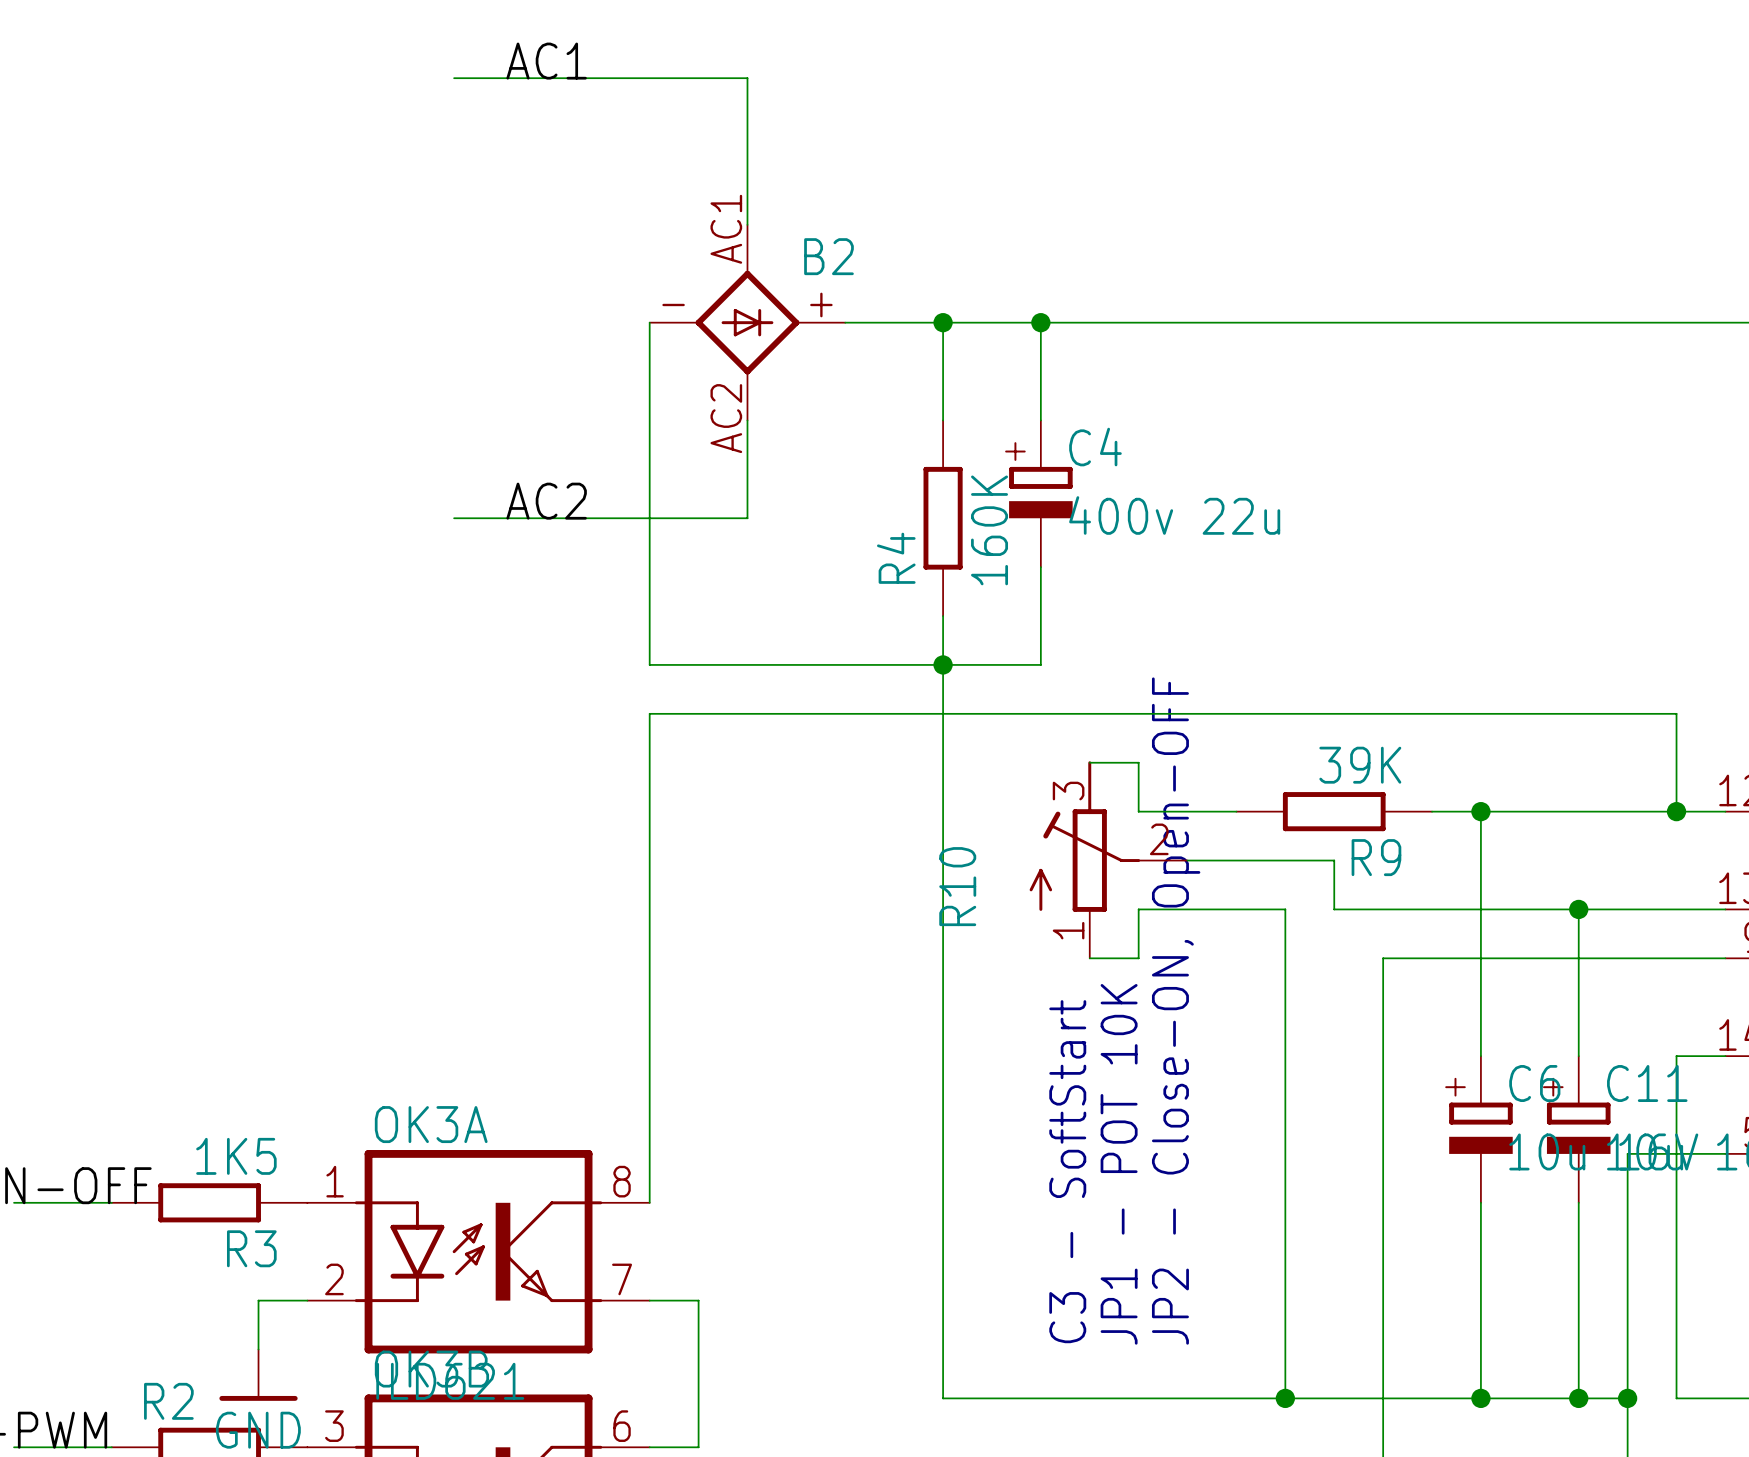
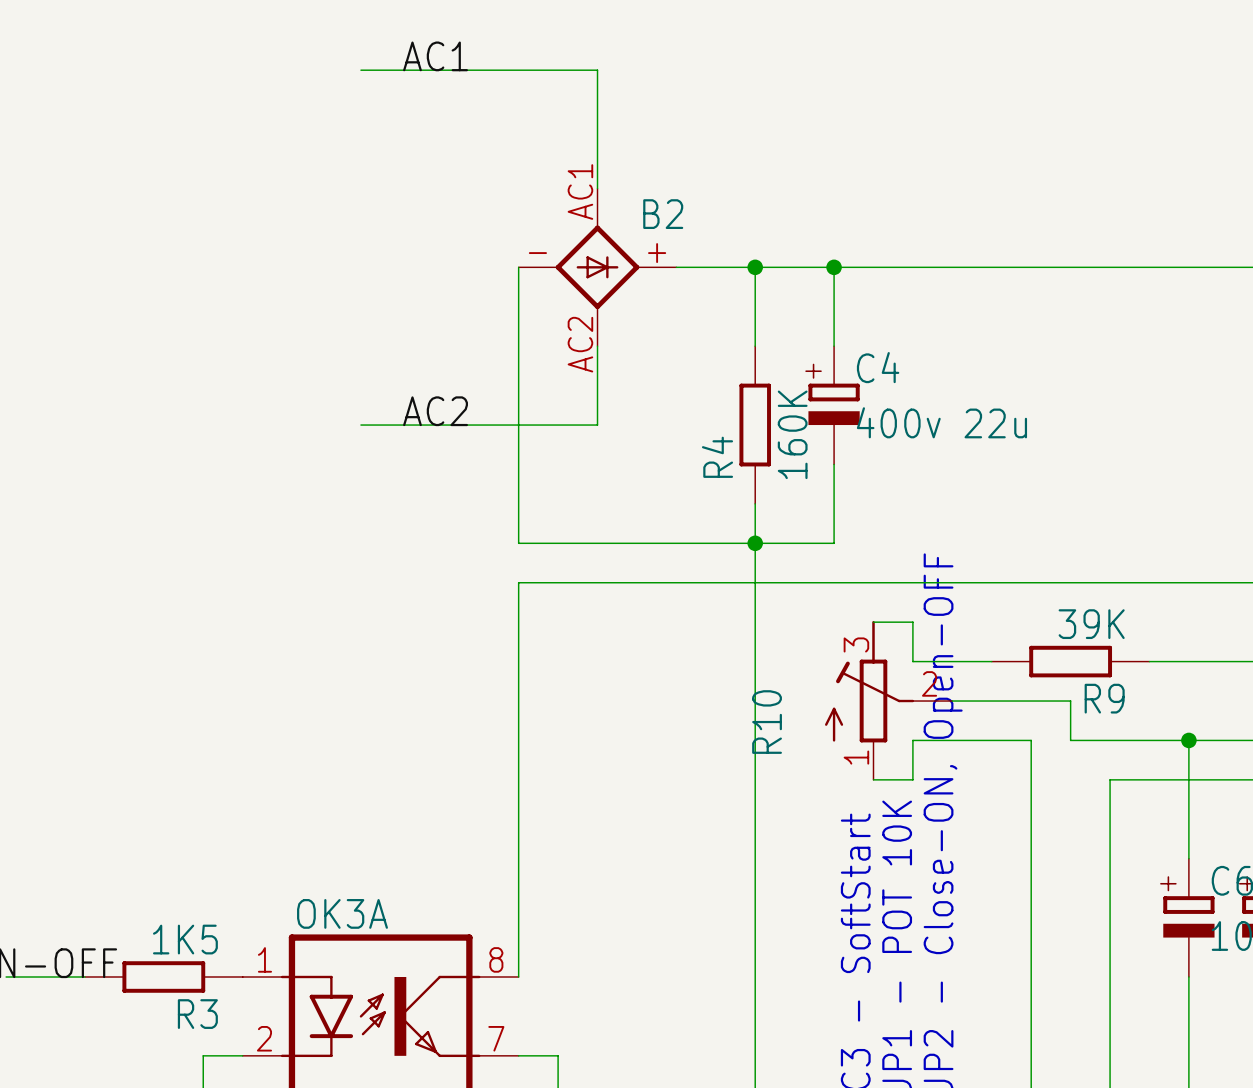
wire: (1480, 811) (1480, 909) -> none
junction position: (1480, 811) -> (1188, 740)

